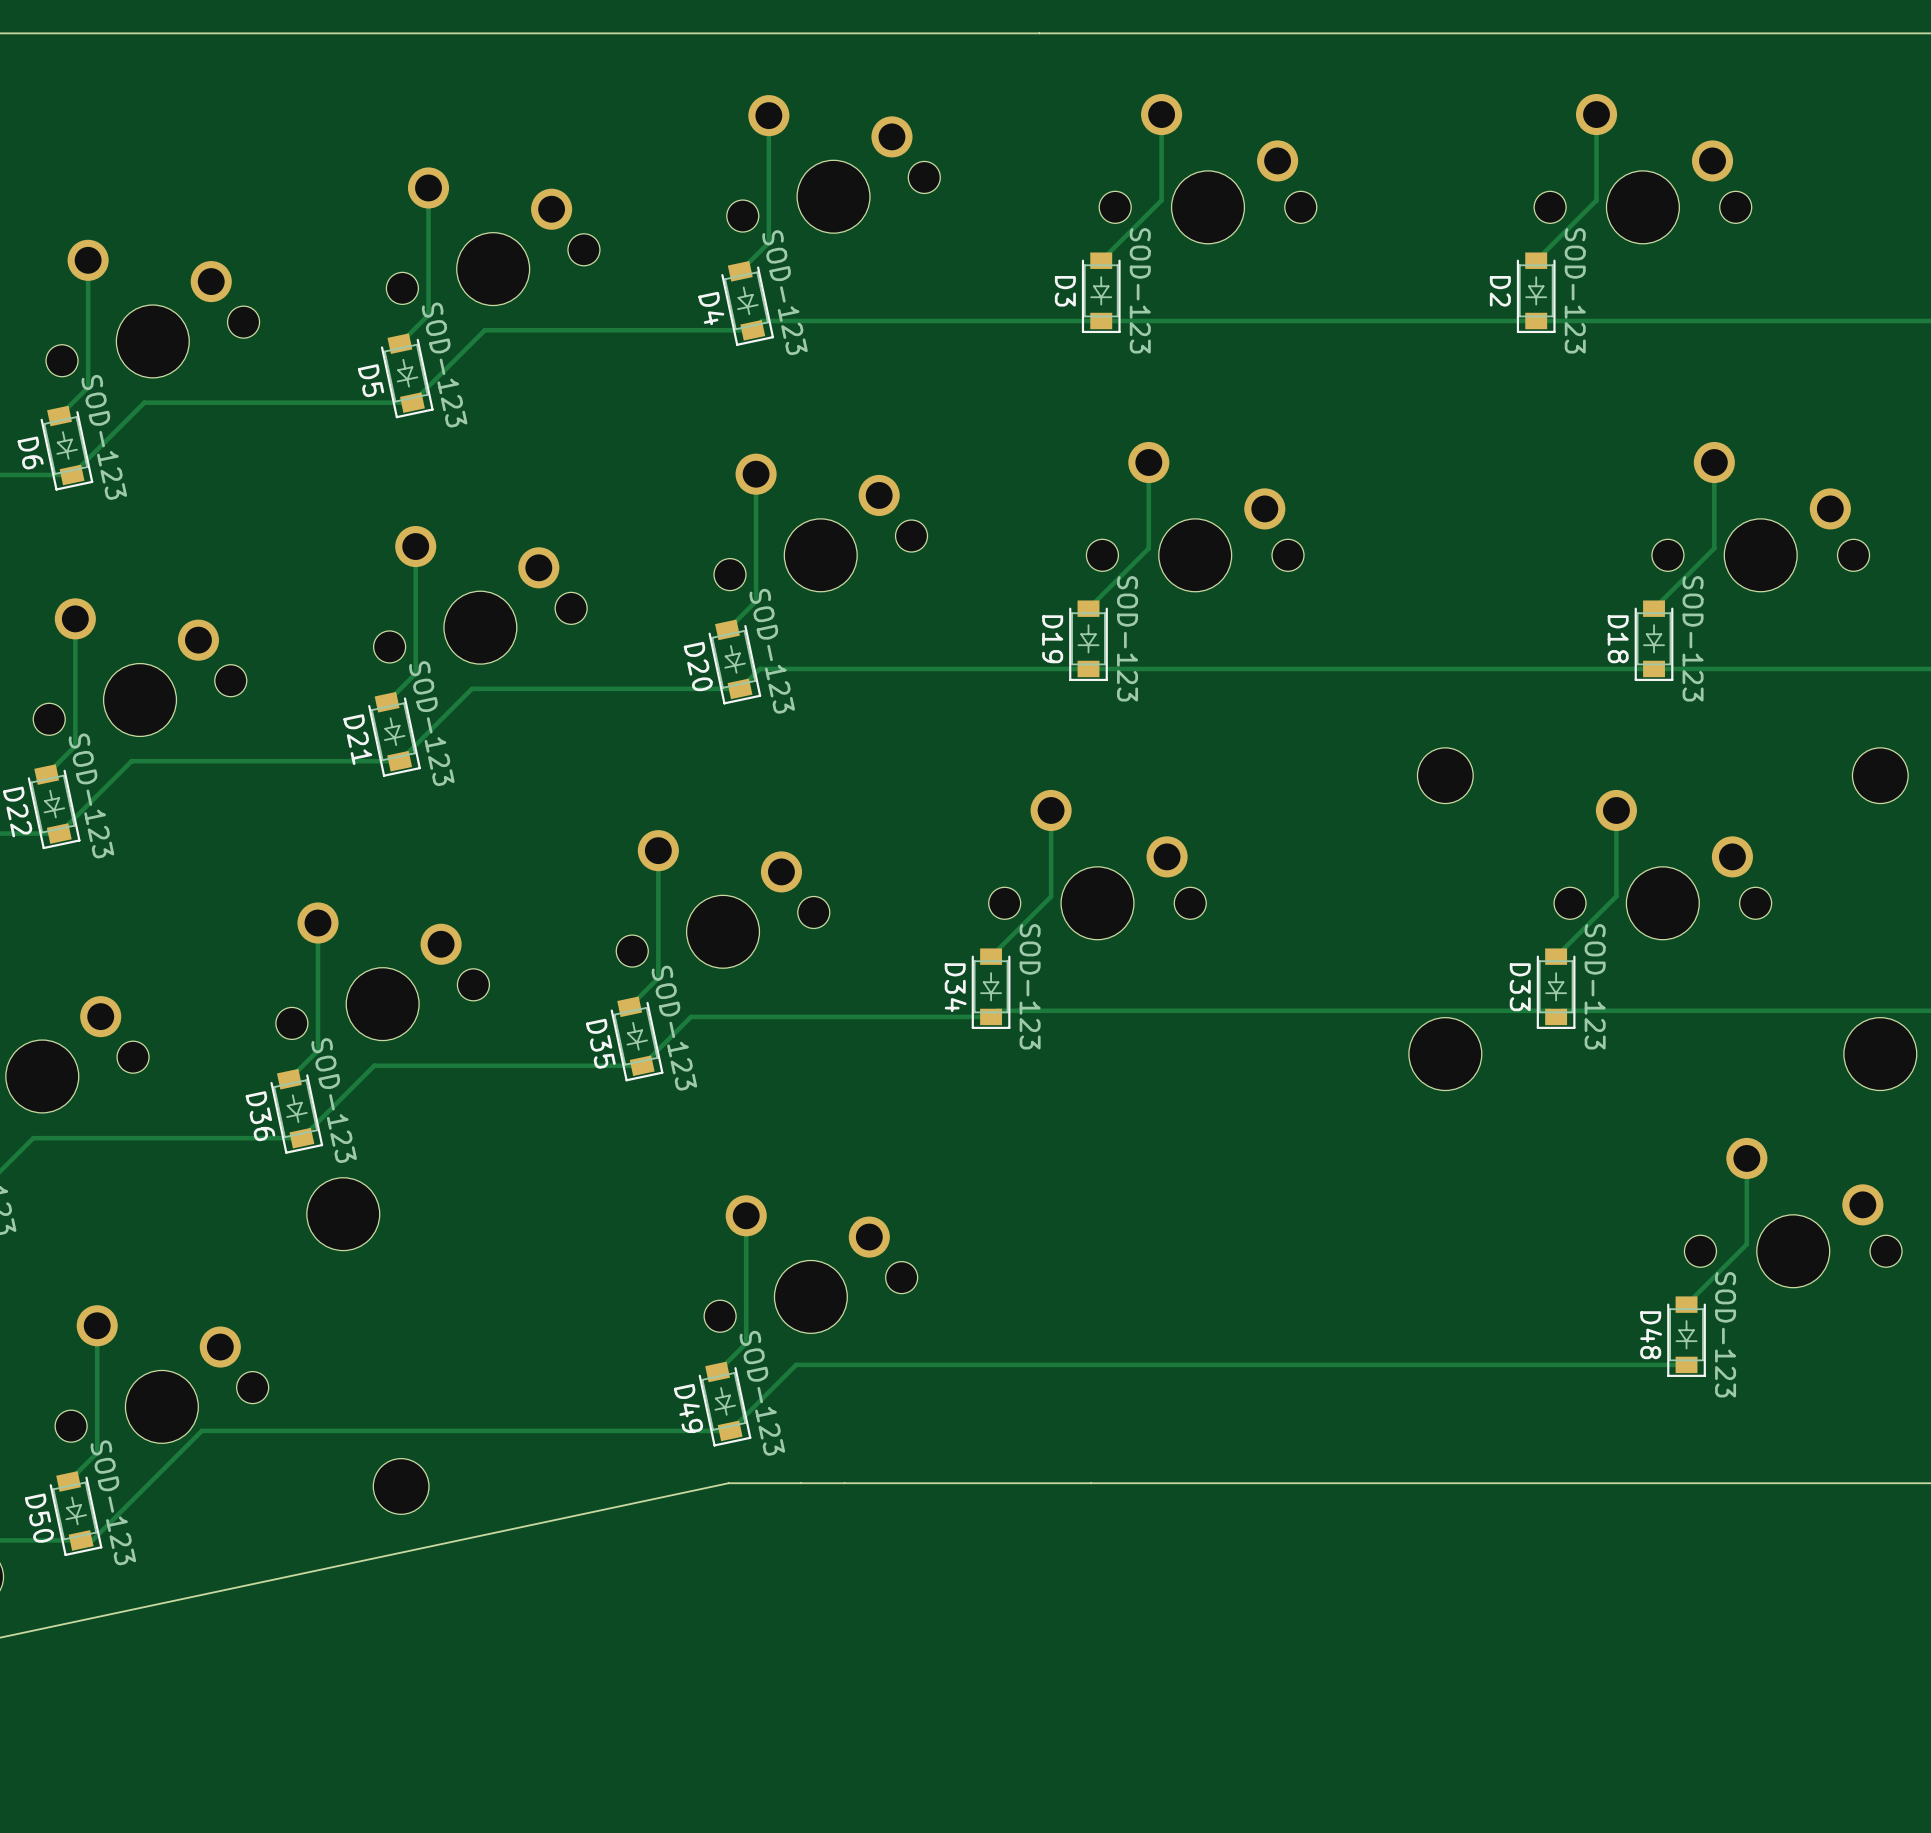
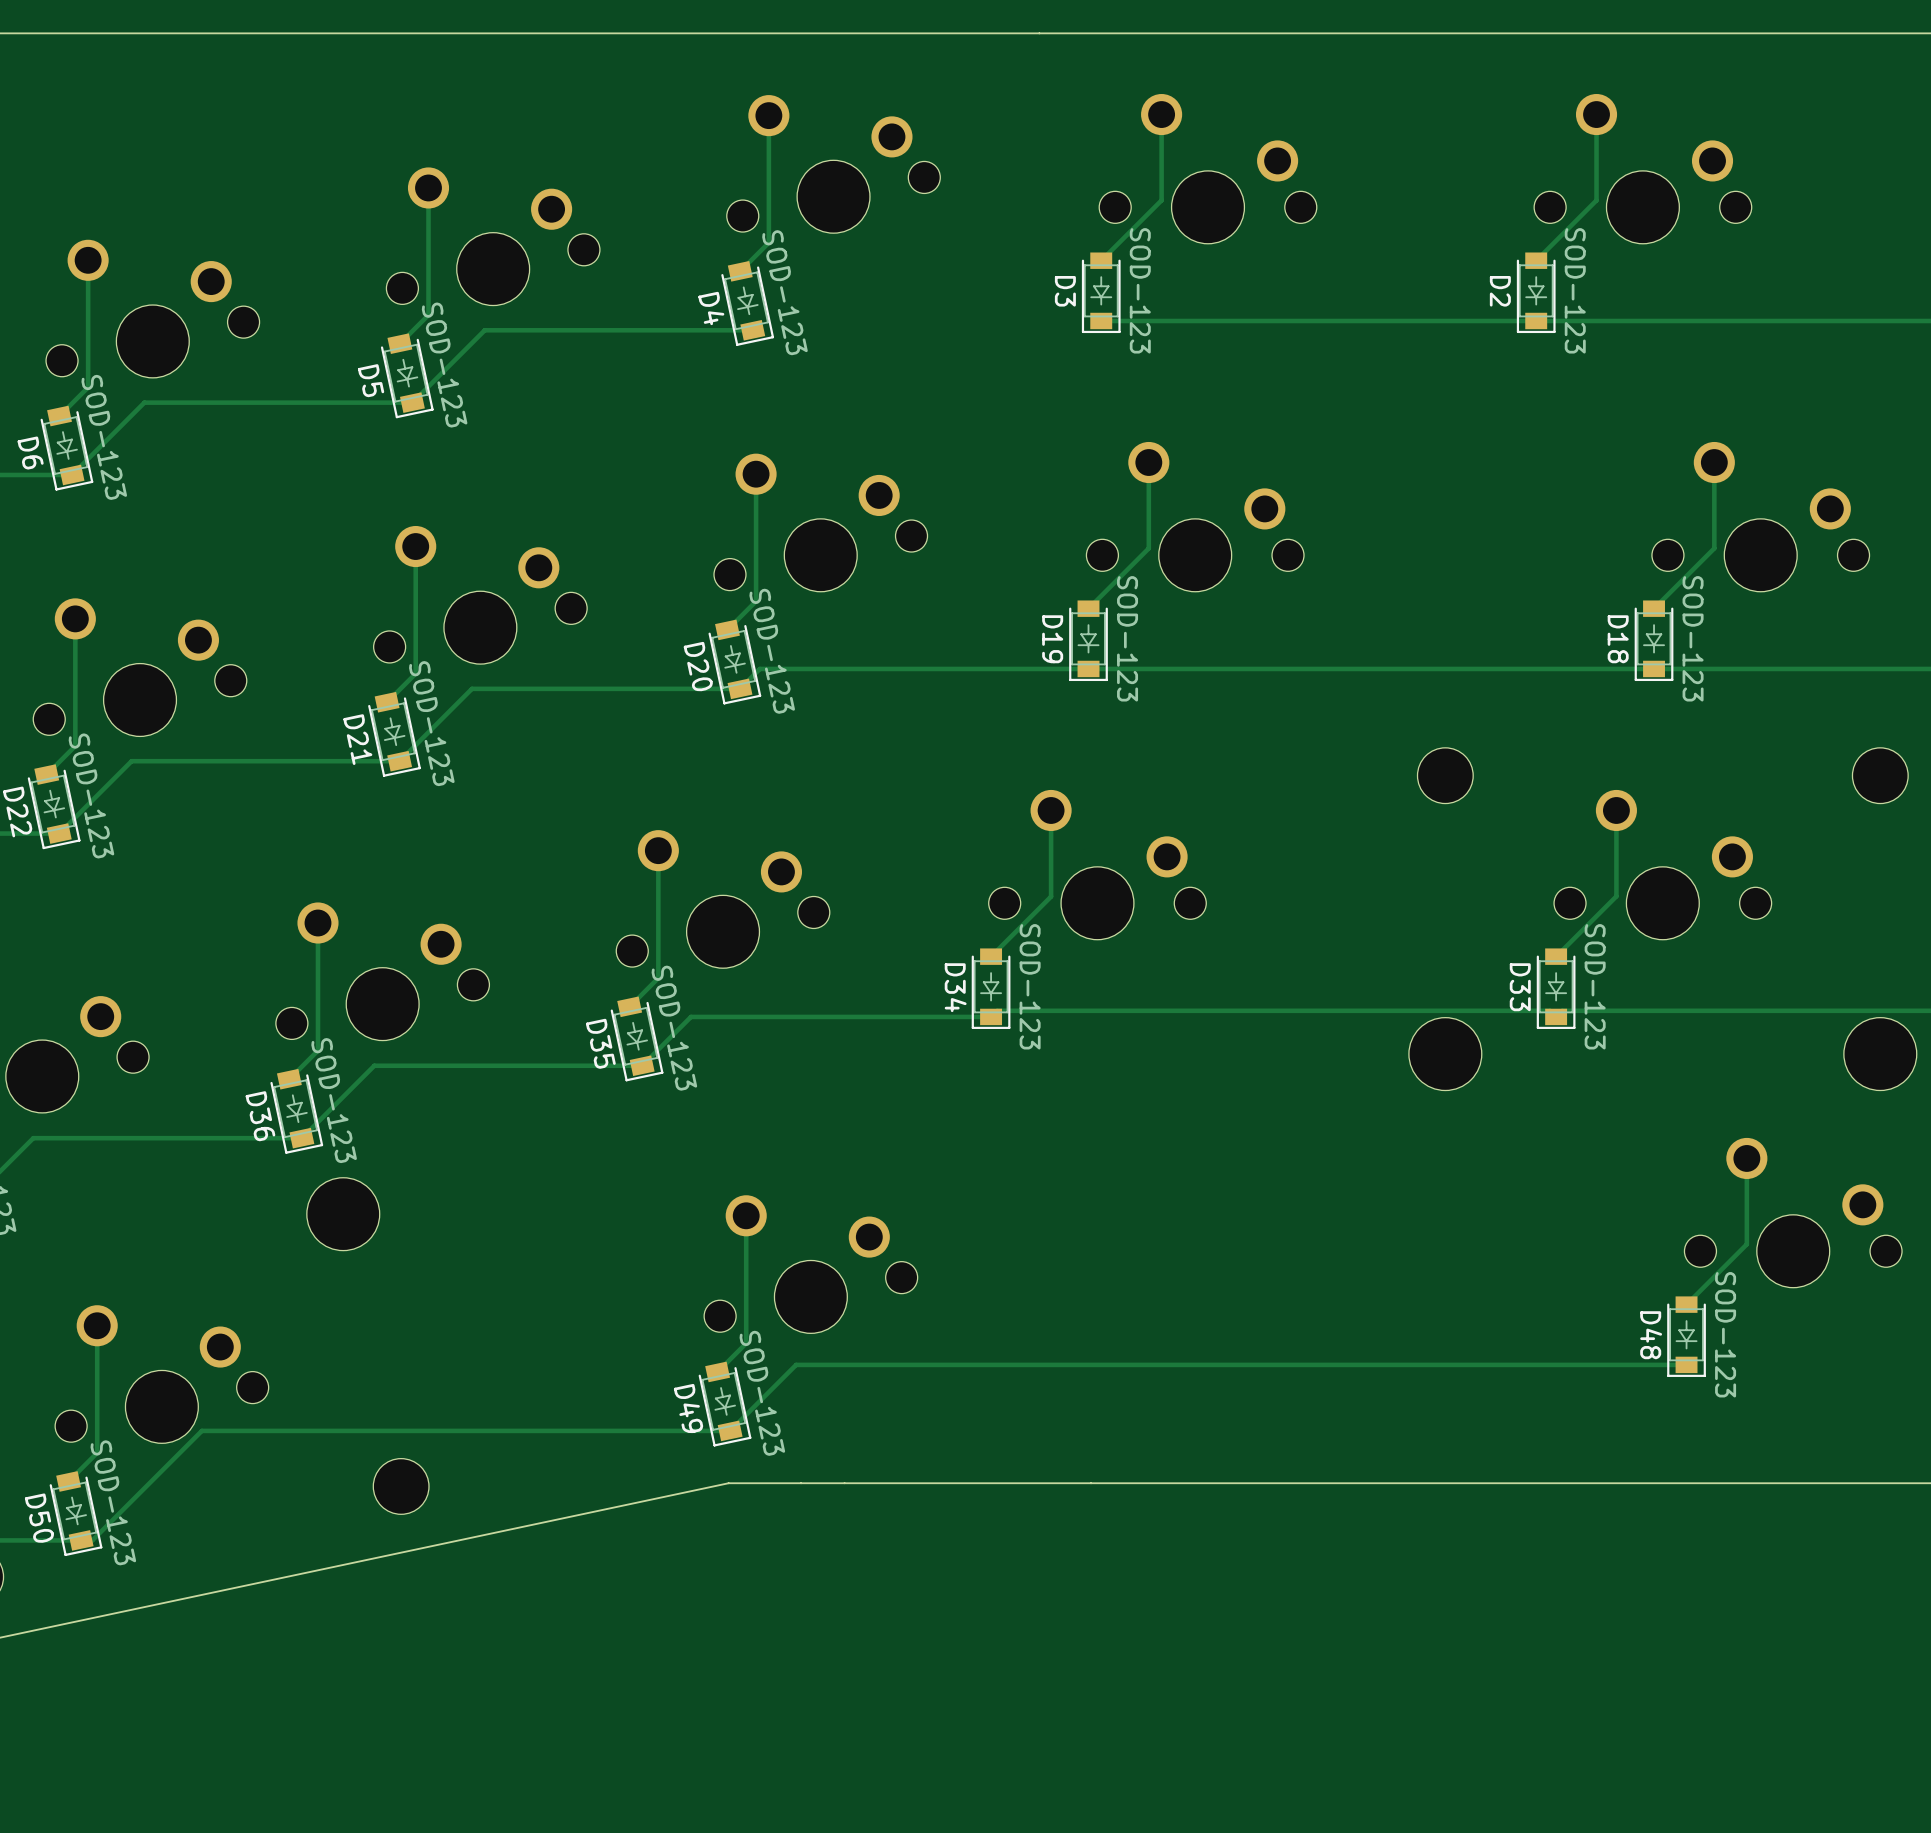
track: (1101, 320) (762, 320) (752, 330) -> none

